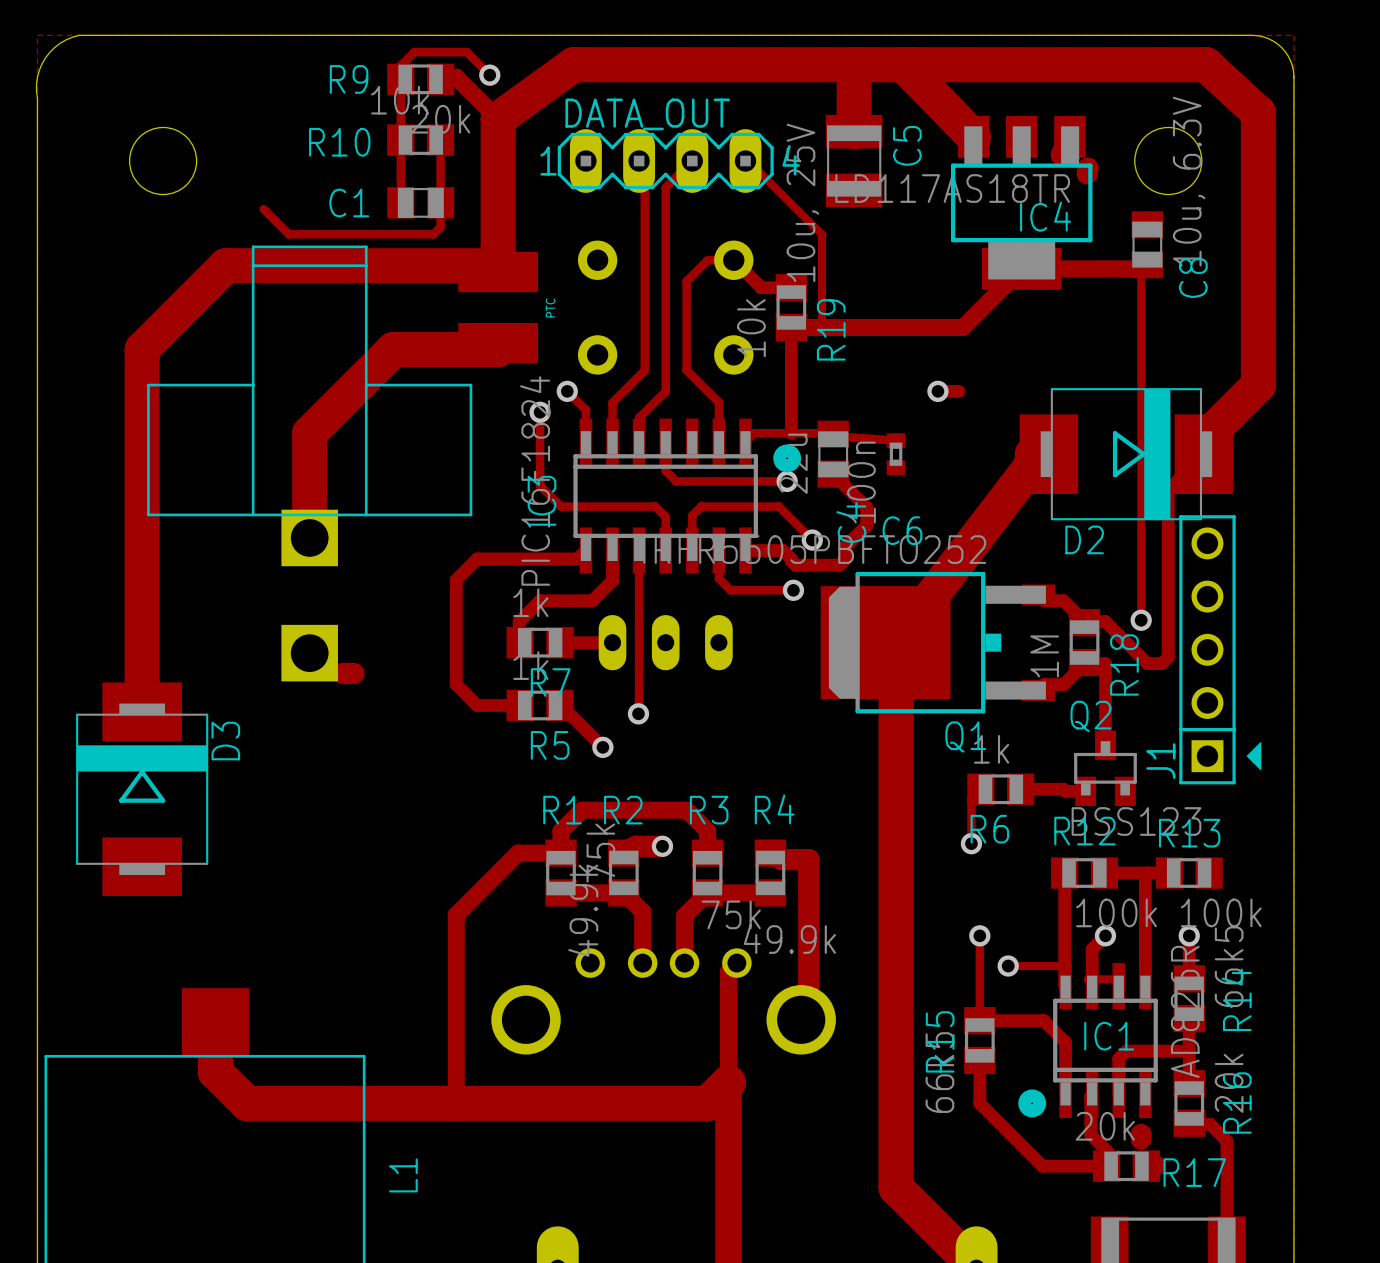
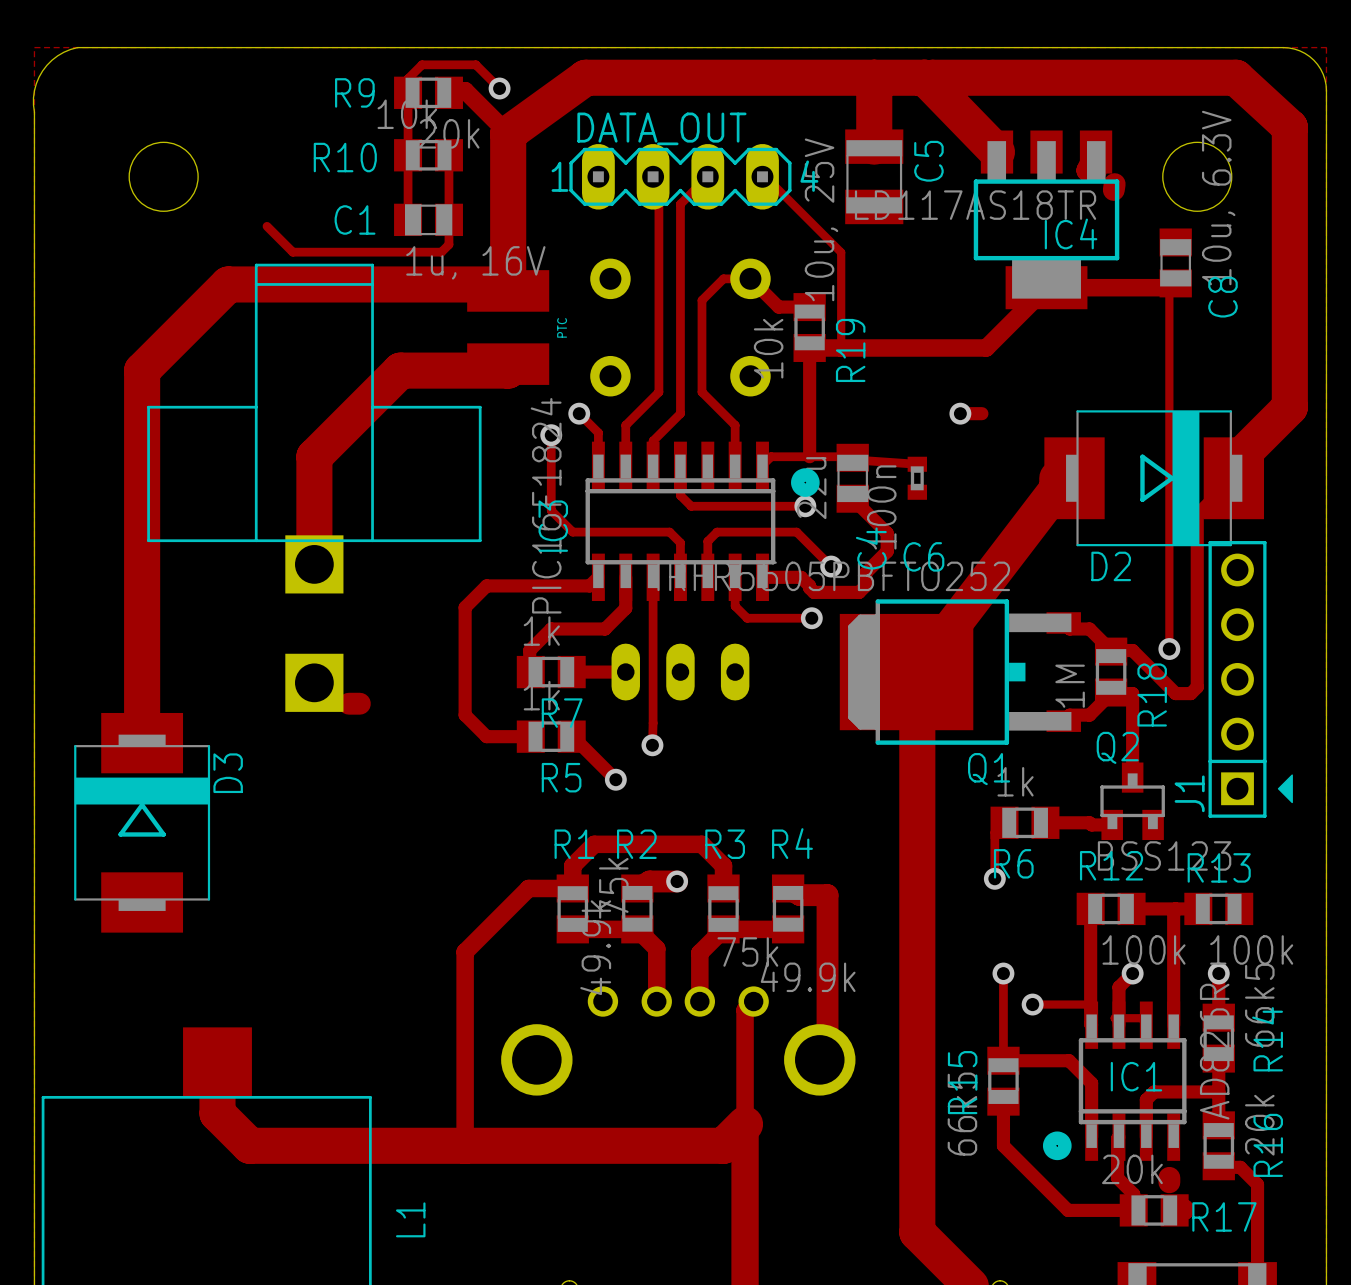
C1 value: none -> 1u, 16V (475, 262)

